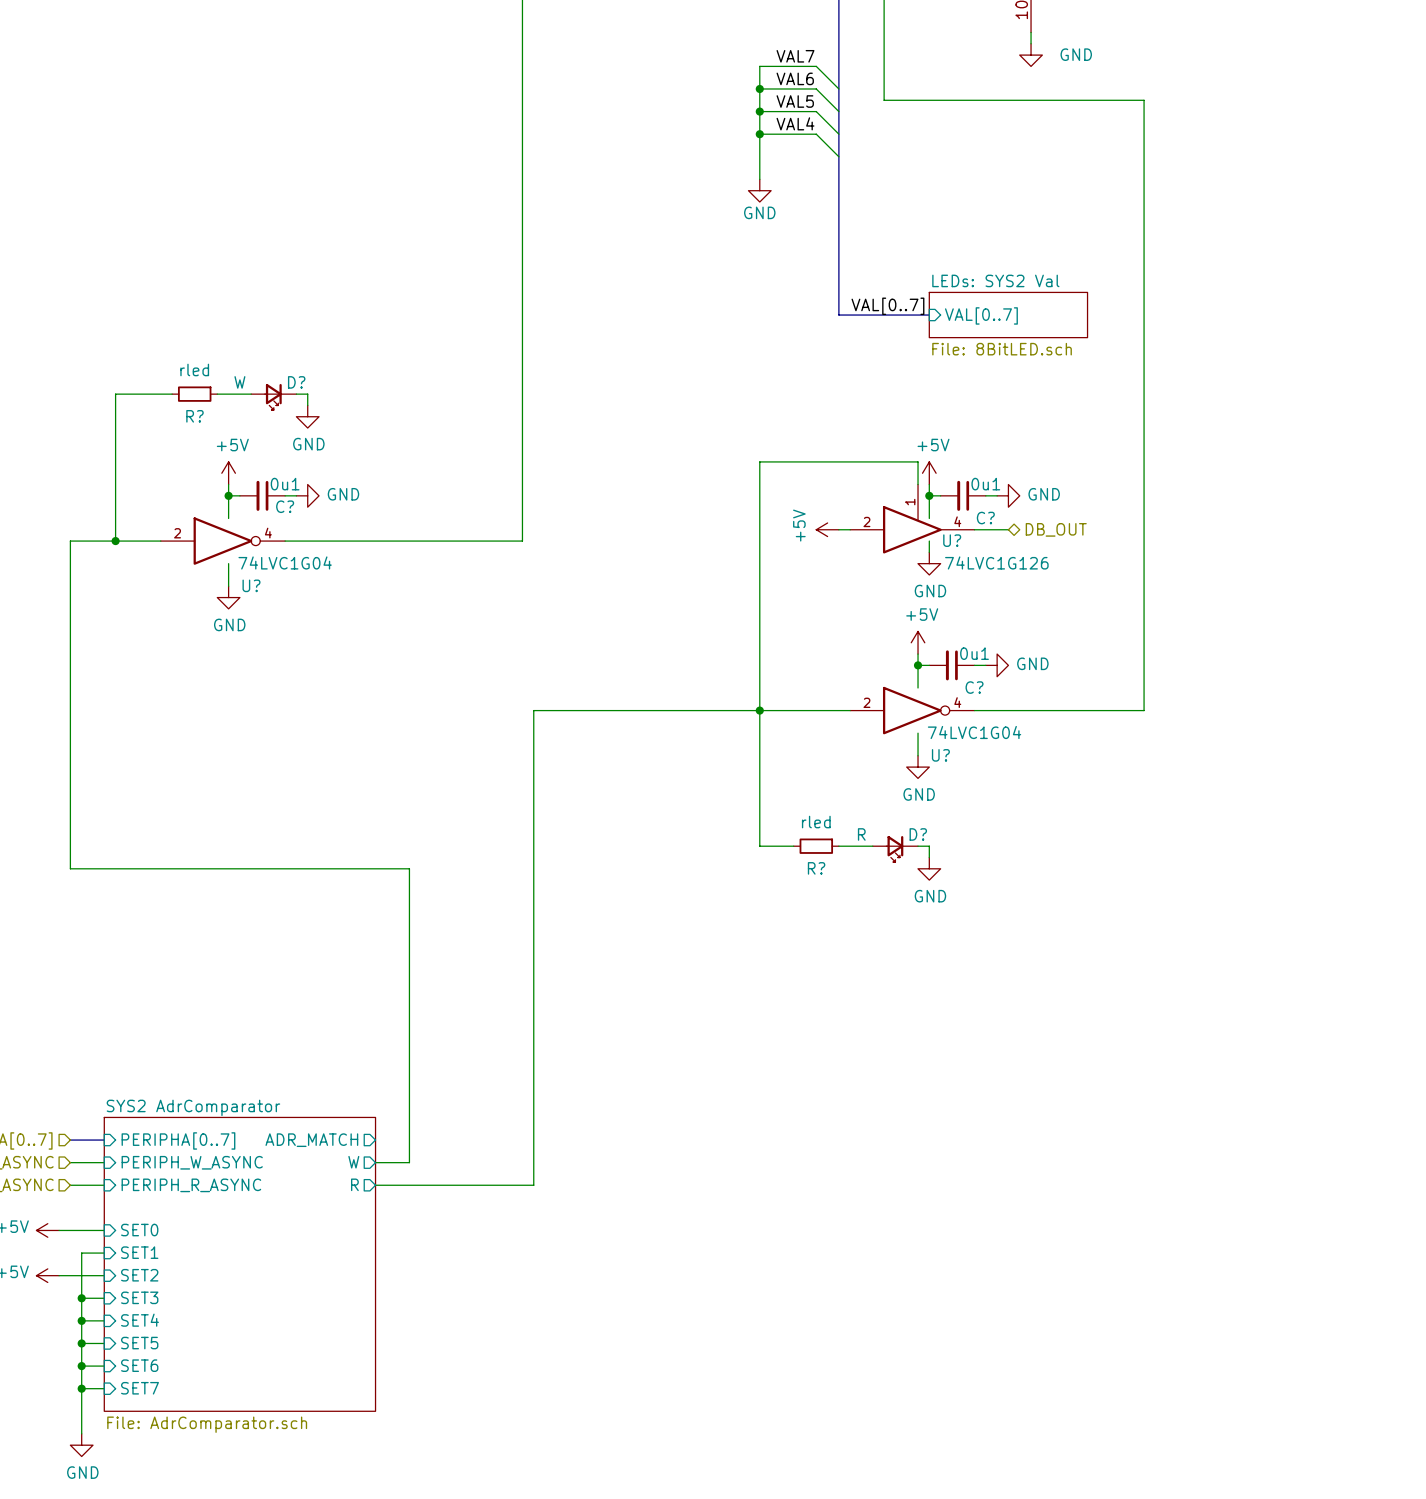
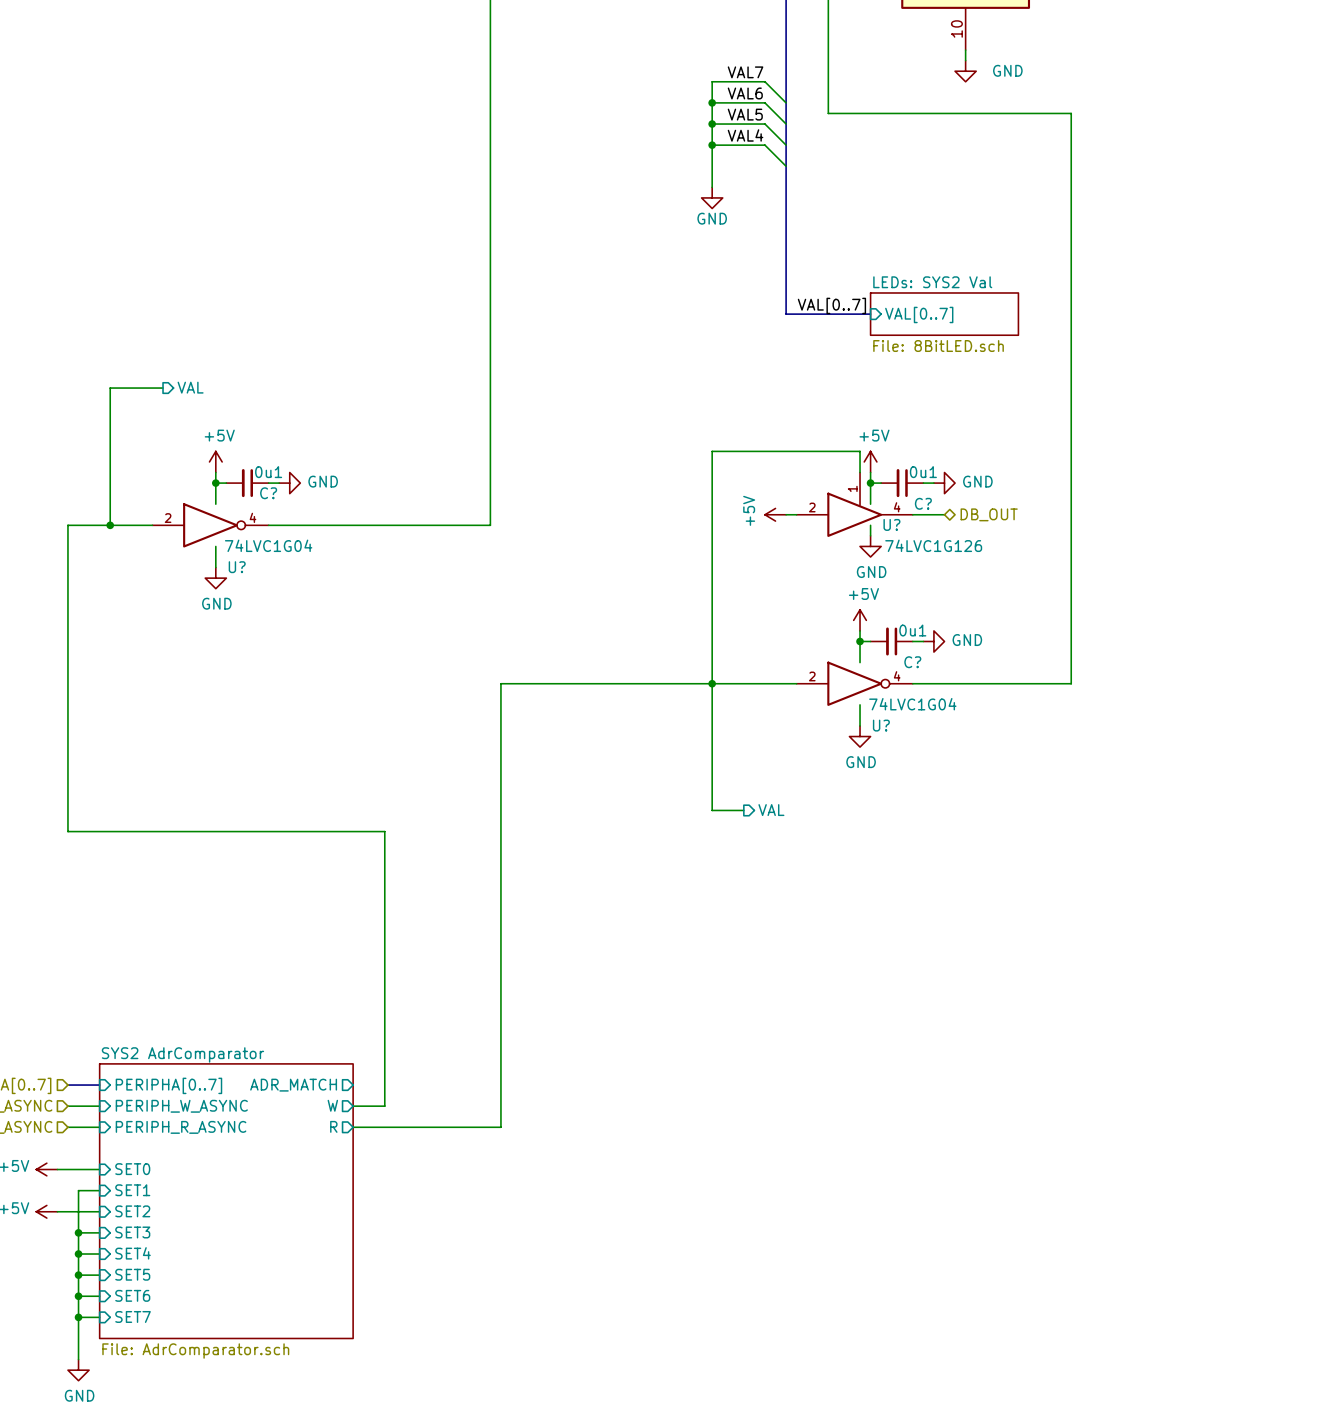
sheet pin: none -> VAL (190, 387)
R?: rled (194, 394) -> none
wire: (217, 394) (251, 394) -> none
wire: (296, 394) (307, 394) (307, 405) -> none
D?: W (273, 396) -> none
power symbol: GND (307, 416) -> none
sheet pin: none -> VAL (771, 810)
R?: rled (816, 846) -> none
wire: (838, 846) (872, 846) -> none
wire: (918, 846) (929, 846) (929, 857) -> none
D?: R (895, 849) -> none
power symbol: GND (929, 868) -> none

